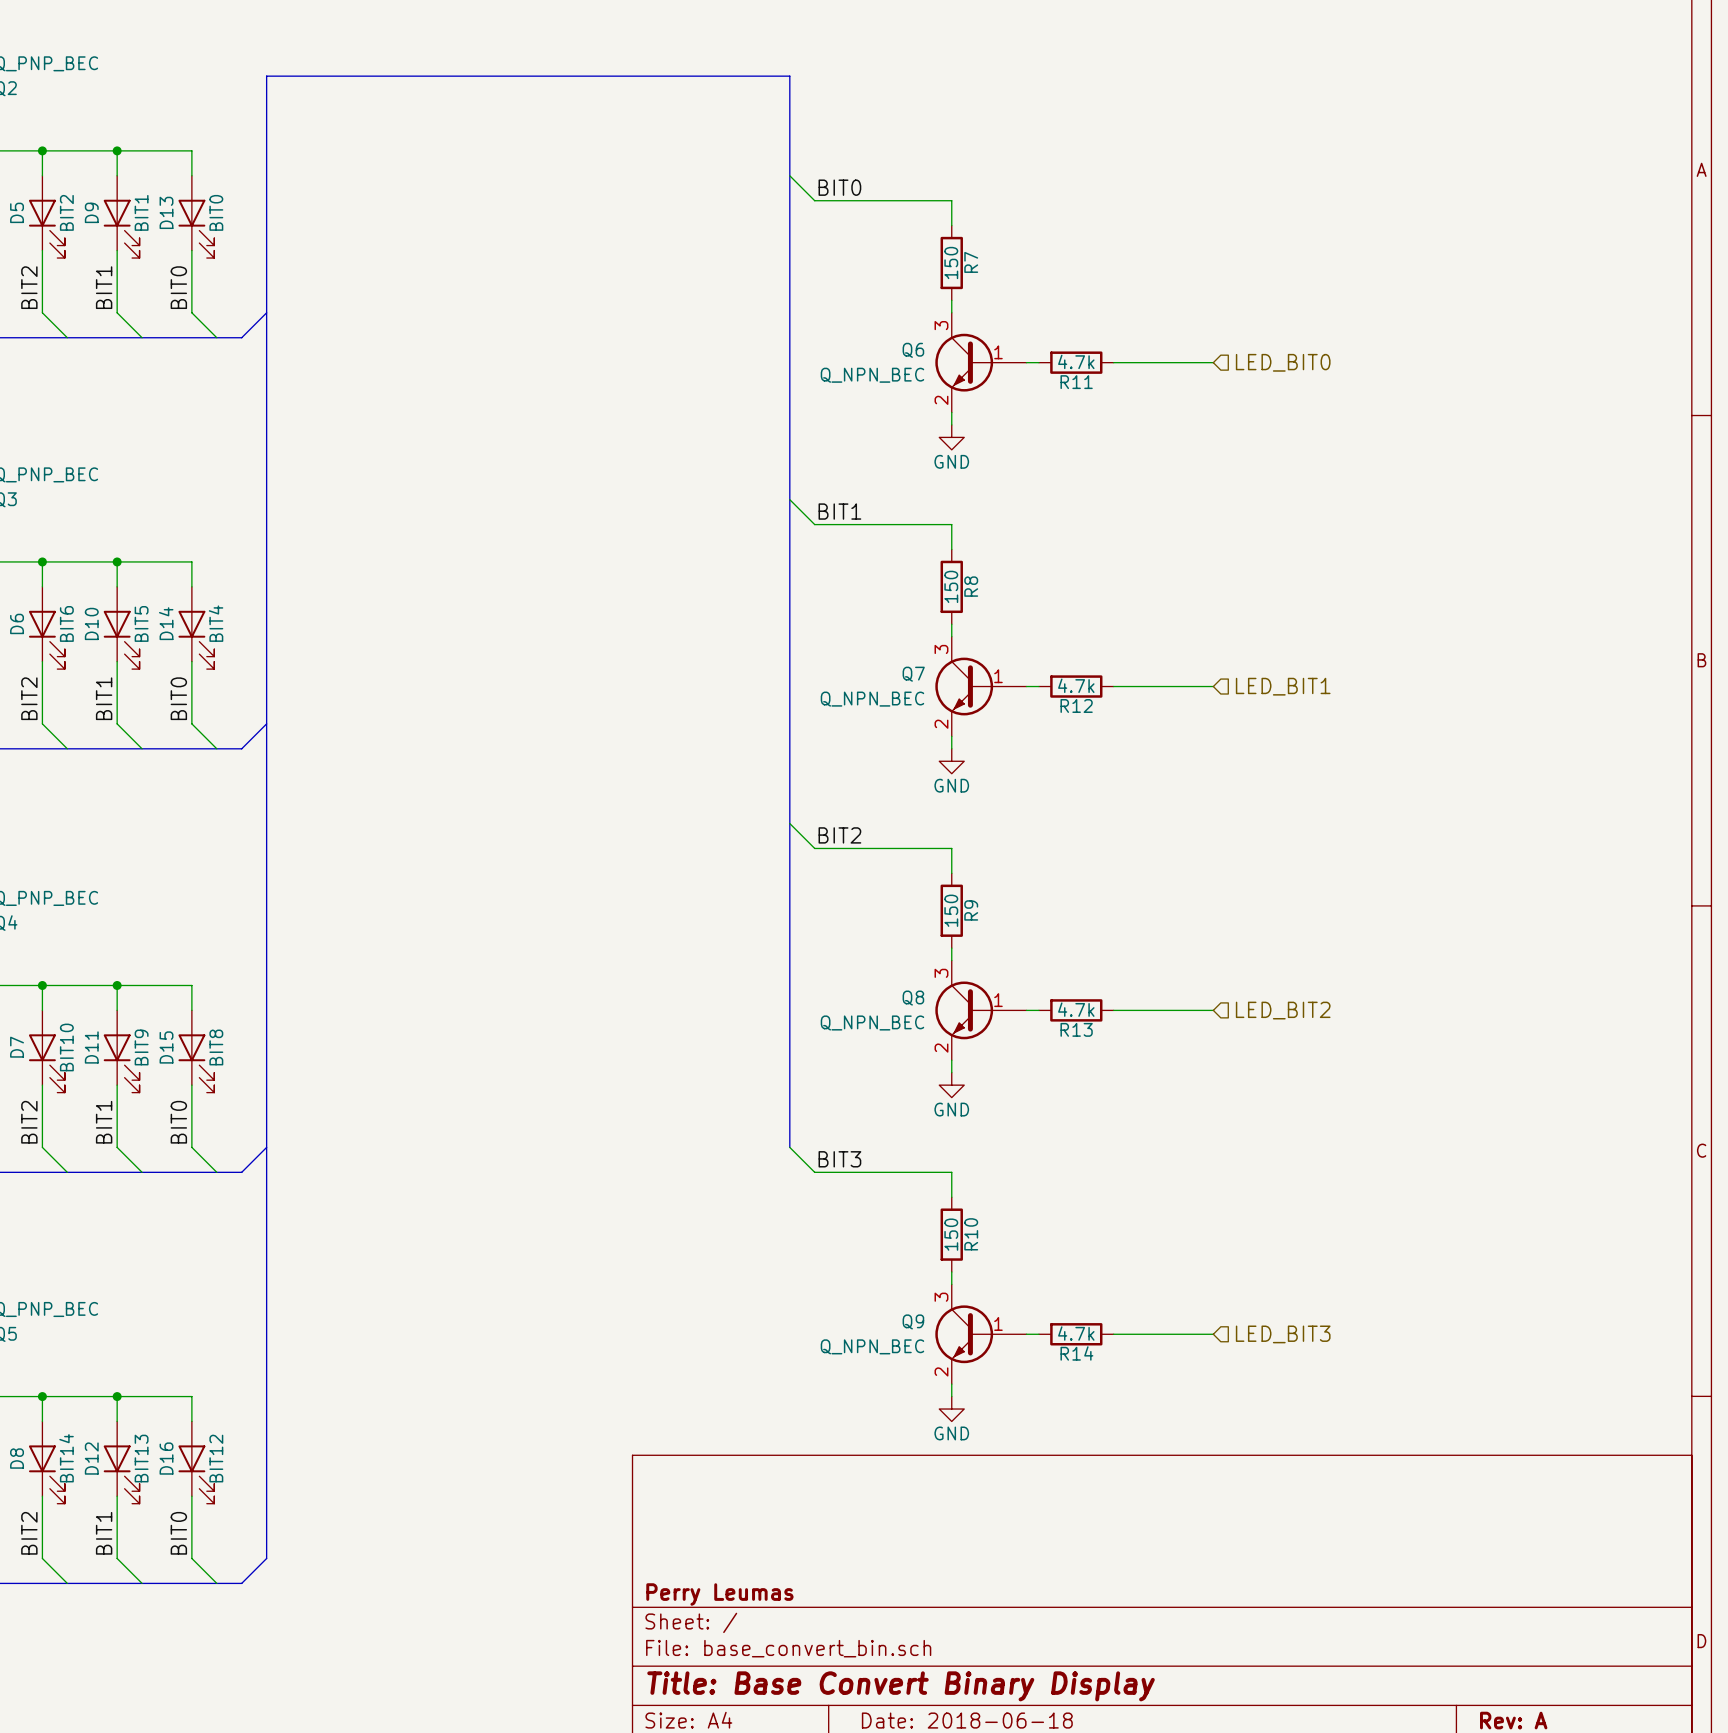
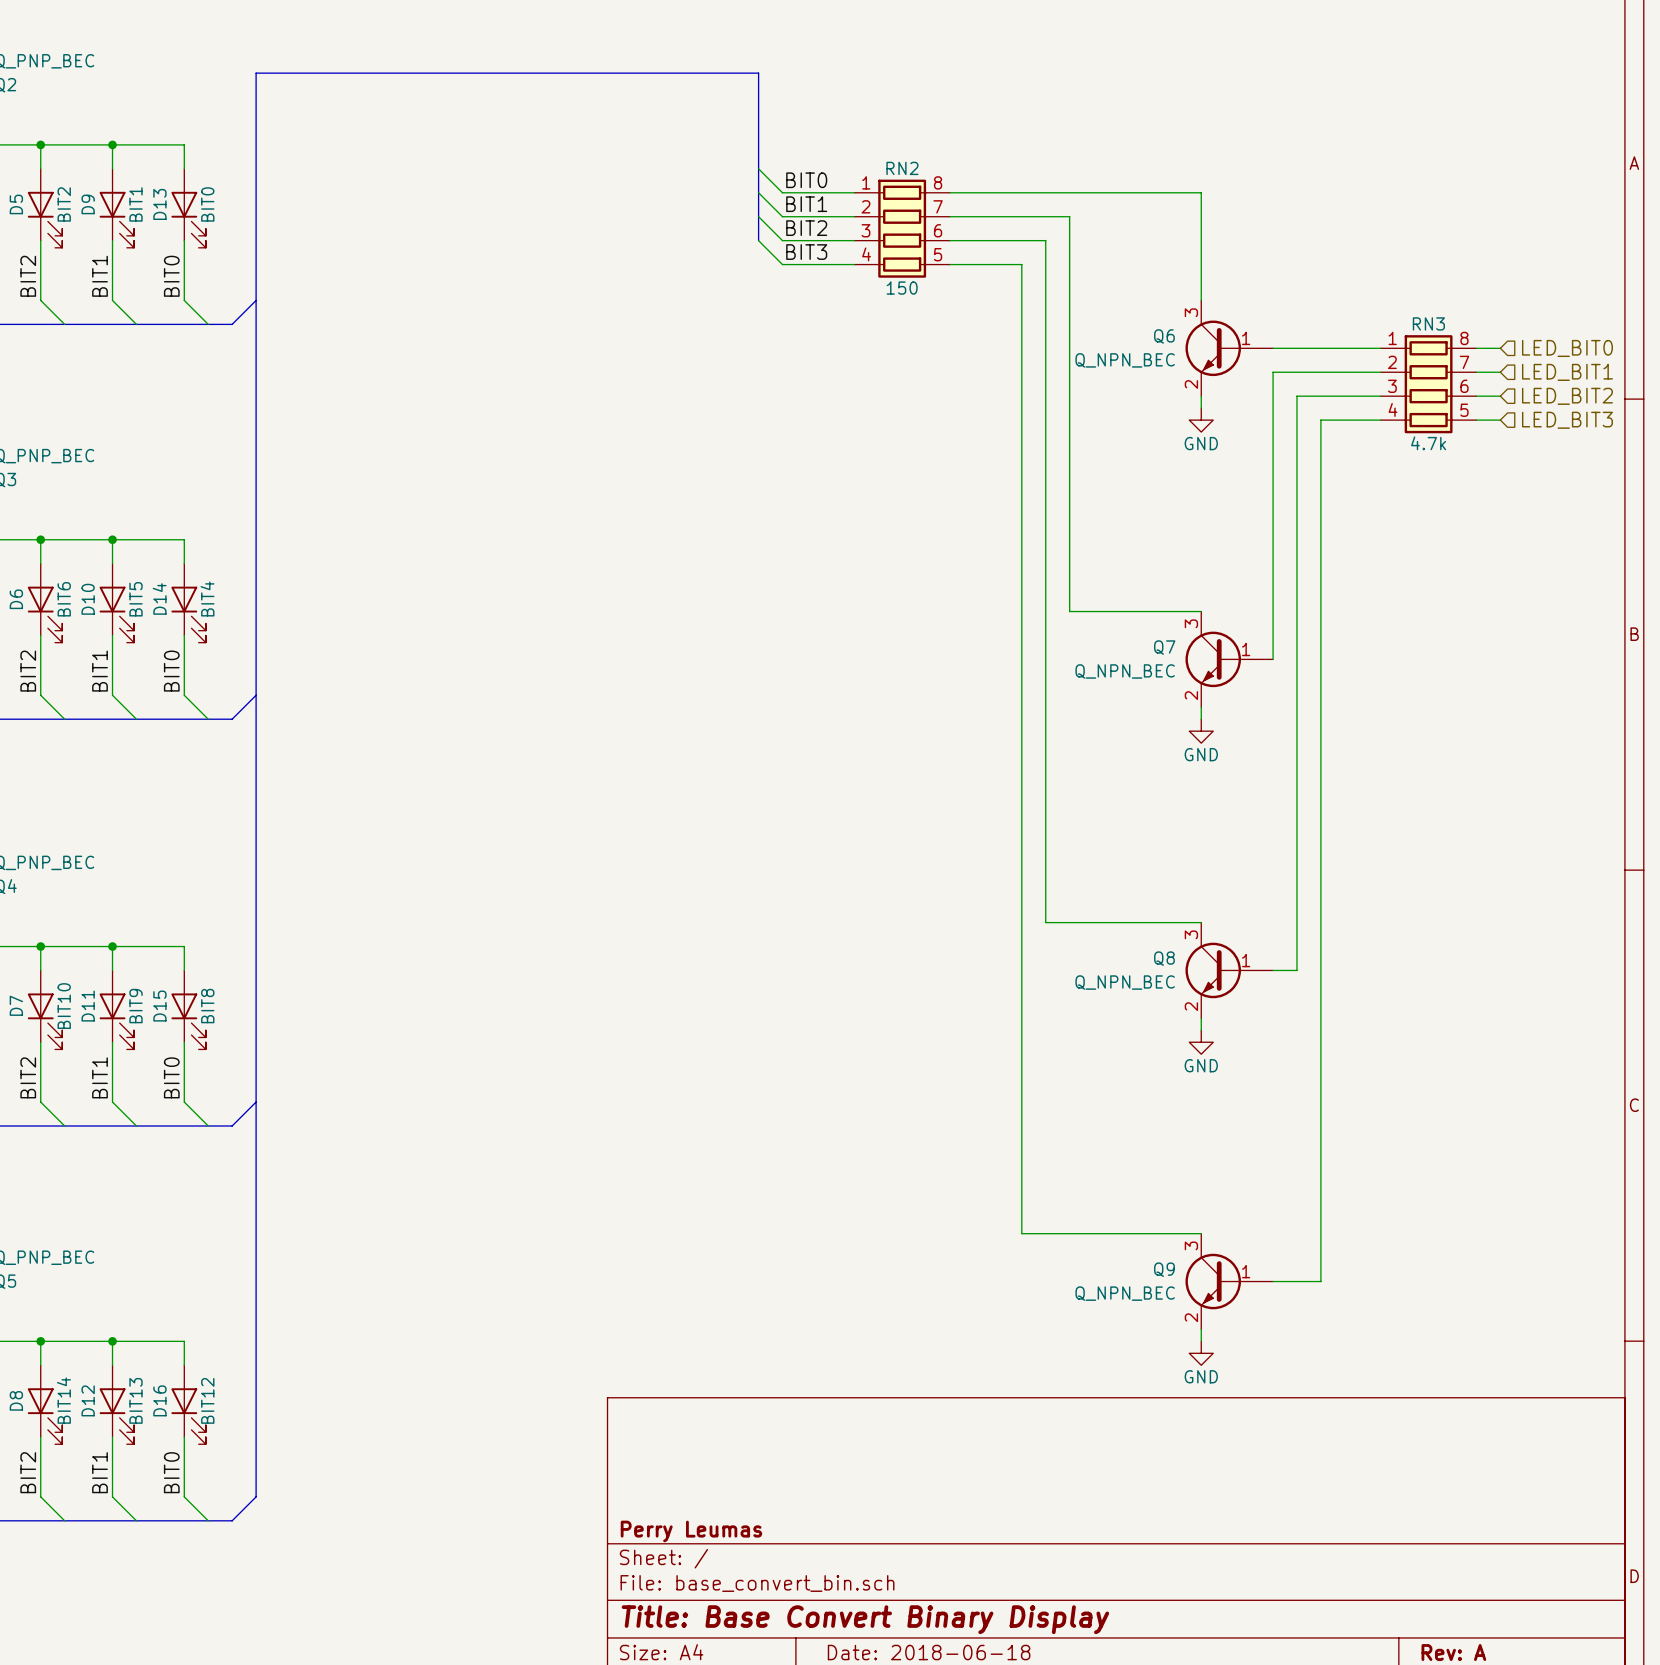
wire: none -> (758, 192) (782, 216) (854, 216)
wire: none -> (950, 192) (1201, 192) (1201, 300)
label: none -> BIT1 (806, 204)
wire: none -> (758, 216) (782, 240) (854, 240)
wire: none -> (950, 216) (1069, 216) (1069, 611) (1201, 611)
label: none -> BIT2 (806, 228)
RN2: none -> 150 (902, 228)
wire: none -> (758, 240) (782, 264) (854, 264)
bus: (789, 250) (789, 1147) -> none
wire: none -> (950, 240) (1045, 240) (1045, 922) (1201, 922)
label: none -> BIT3 (806, 252)
R7: 150 (951, 263) -> none
wire: none -> (950, 264) (1021, 264) (1021, 1233) (1201, 1233)
wire: (951, 300) (951, 312) -> none
Q6 position: (980, 362) -> (1229, 348)
wire: (1026, 362) (1038, 362) -> none
R11: 4.7k (1076, 362) -> none
wire: (1113, 362) (1213, 362) -> none
hierarchical label: LED_BIT0 (1283, 362) -> none
wire: none -> (1273, 348) (1380, 348)
wire: none -> (1476, 348) (1500, 348)
hierarchical label: none -> LED_BIT0 (1567, 348)
wire: none -> (1380, 372) (1273, 372) (1273, 659)
wire: none -> (1476, 372) (1500, 372)
hierarchical label: none -> LED_BIT1 (1567, 372)
RN3: none -> 4.7k (1428, 384)
wire: (951, 412) (951, 424) -> none
wire: none -> (1201, 396) (1201, 408)
wire: none -> (1380, 396) (1296, 396) (1296, 970) (1273, 970)
wire: none -> (1476, 396) (1500, 396)
hierarchical label: none -> LED_BIT2 (1567, 396)
power symbol: GND (951, 437) -> none
power symbol: none -> GND (1201, 420)
wire: none -> (1380, 420) (1320, 420) (1320, 1281) (1273, 1281)
wire: none -> (1476, 420) (1500, 420)
hierarchical label: none -> LED_BIT3 (1567, 420)
wire: (789, 499) (814, 524) (951, 524) (951, 549) -> none
label: BIT1 (839, 511) -> none
R8: 150 (951, 586) -> none
wire: (951, 624) (951, 636) -> none
Q7 position: (980, 686) -> (1229, 659)
wire: (1026, 686) (1038, 686) -> none
R12: 4.7k (1076, 686) -> none
wire: (1113, 686) (1213, 686) -> none
hierarchical label: LED_BIT1 (1283, 686) -> none
wire: (951, 736) (951, 748) -> none
wire: none -> (1201, 707) (1201, 719)
power symbol: GND (951, 761) -> none
power symbol: none -> GND (1201, 731)
wire: (789, 823) (814, 848) (951, 848) (951, 873) -> none
label: BIT2 (839, 835) -> none
R9: 150 (951, 910) -> none
wire: (951, 948) (951, 960) -> none
Q8 position: (980, 1010) -> (1229, 970)
wire: (1026, 1010) (1038, 1010) -> none
R13: 4.7k (1076, 1010) -> none
wire: (1113, 1010) (1213, 1010) -> none
hierarchical label: LED_BIT2 (1283, 1010) -> none
wire: (951, 1060) (951, 1072) -> none
wire: none -> (1201, 1018) (1201, 1030)
power symbol: GND (951, 1085) -> none
power symbol: none -> GND (1201, 1042)
wire: (789, 1147) (814, 1172) (951, 1172) (951, 1197) -> none
label: BIT3 (839, 1159) -> none
R10: 150 (951, 1234) -> none
wire: (951, 1271) (951, 1284) -> none
Q9 position: (980, 1334) -> (1229, 1281)
wire: (1026, 1334) (1038, 1334) -> none
R14: 4.7k (1076, 1334) -> none
wire: (1113, 1334) (1213, 1334) -> none
hierarchical label: LED_BIT3 (1283, 1334) -> none
wire: (951, 1384) (951, 1396) -> none
wire: none -> (1201, 1329) (1201, 1341)
power symbol: GND (951, 1409) -> none
power symbol: none -> GND (1201, 1353)

